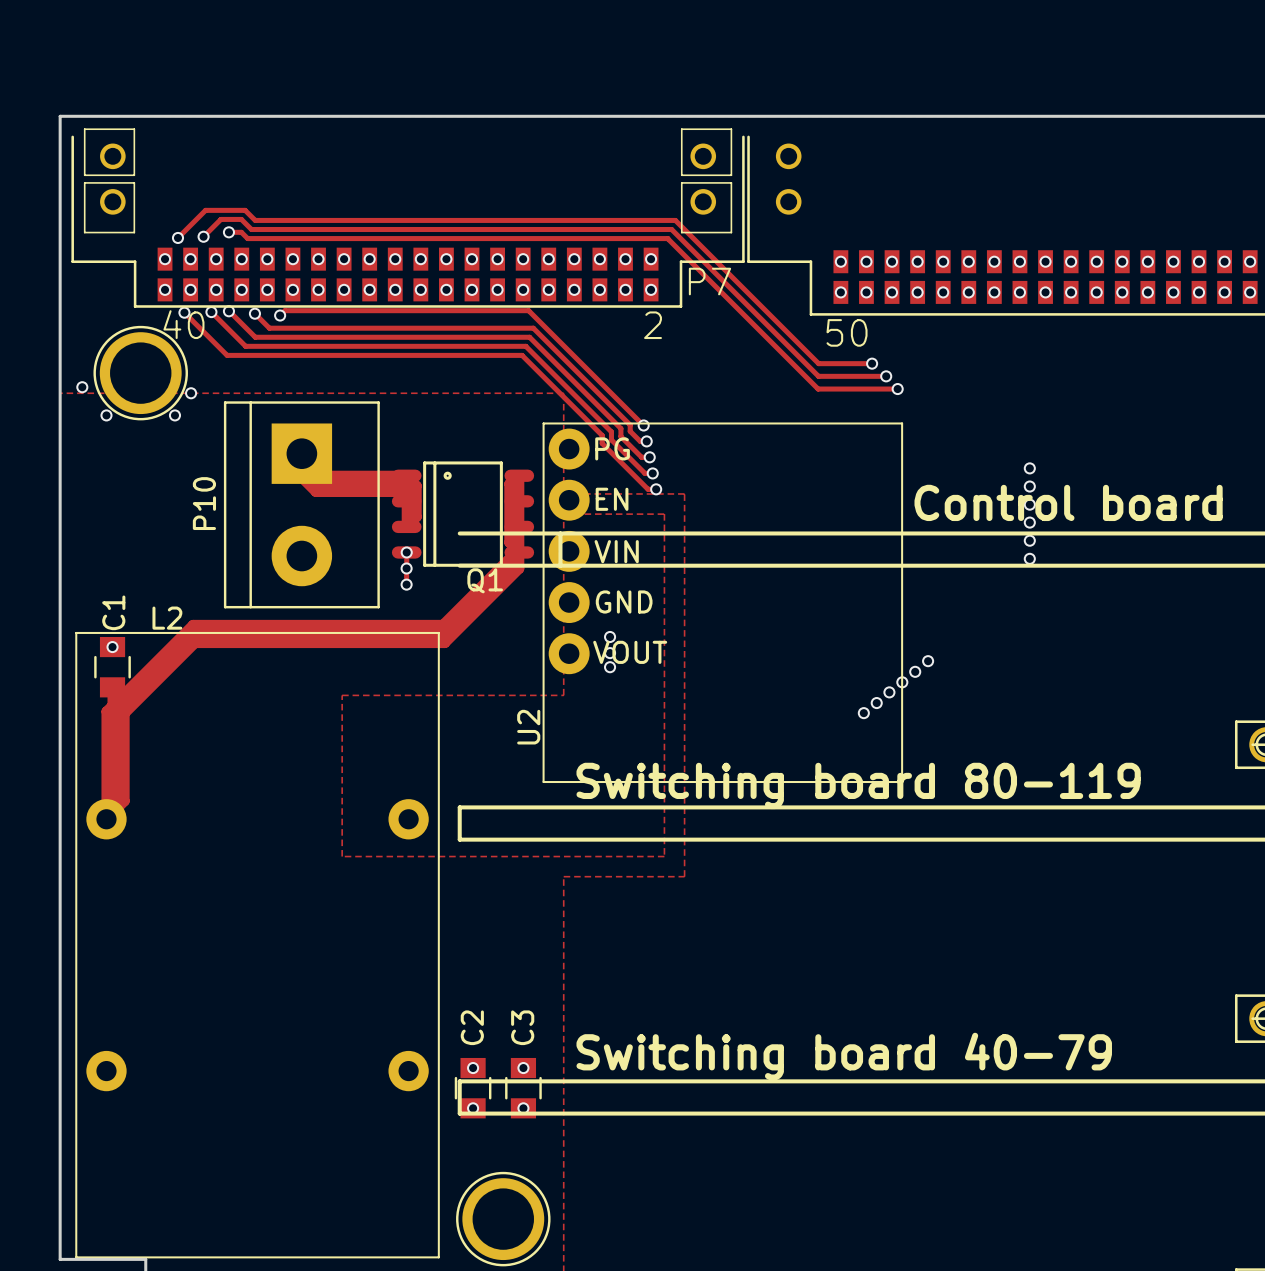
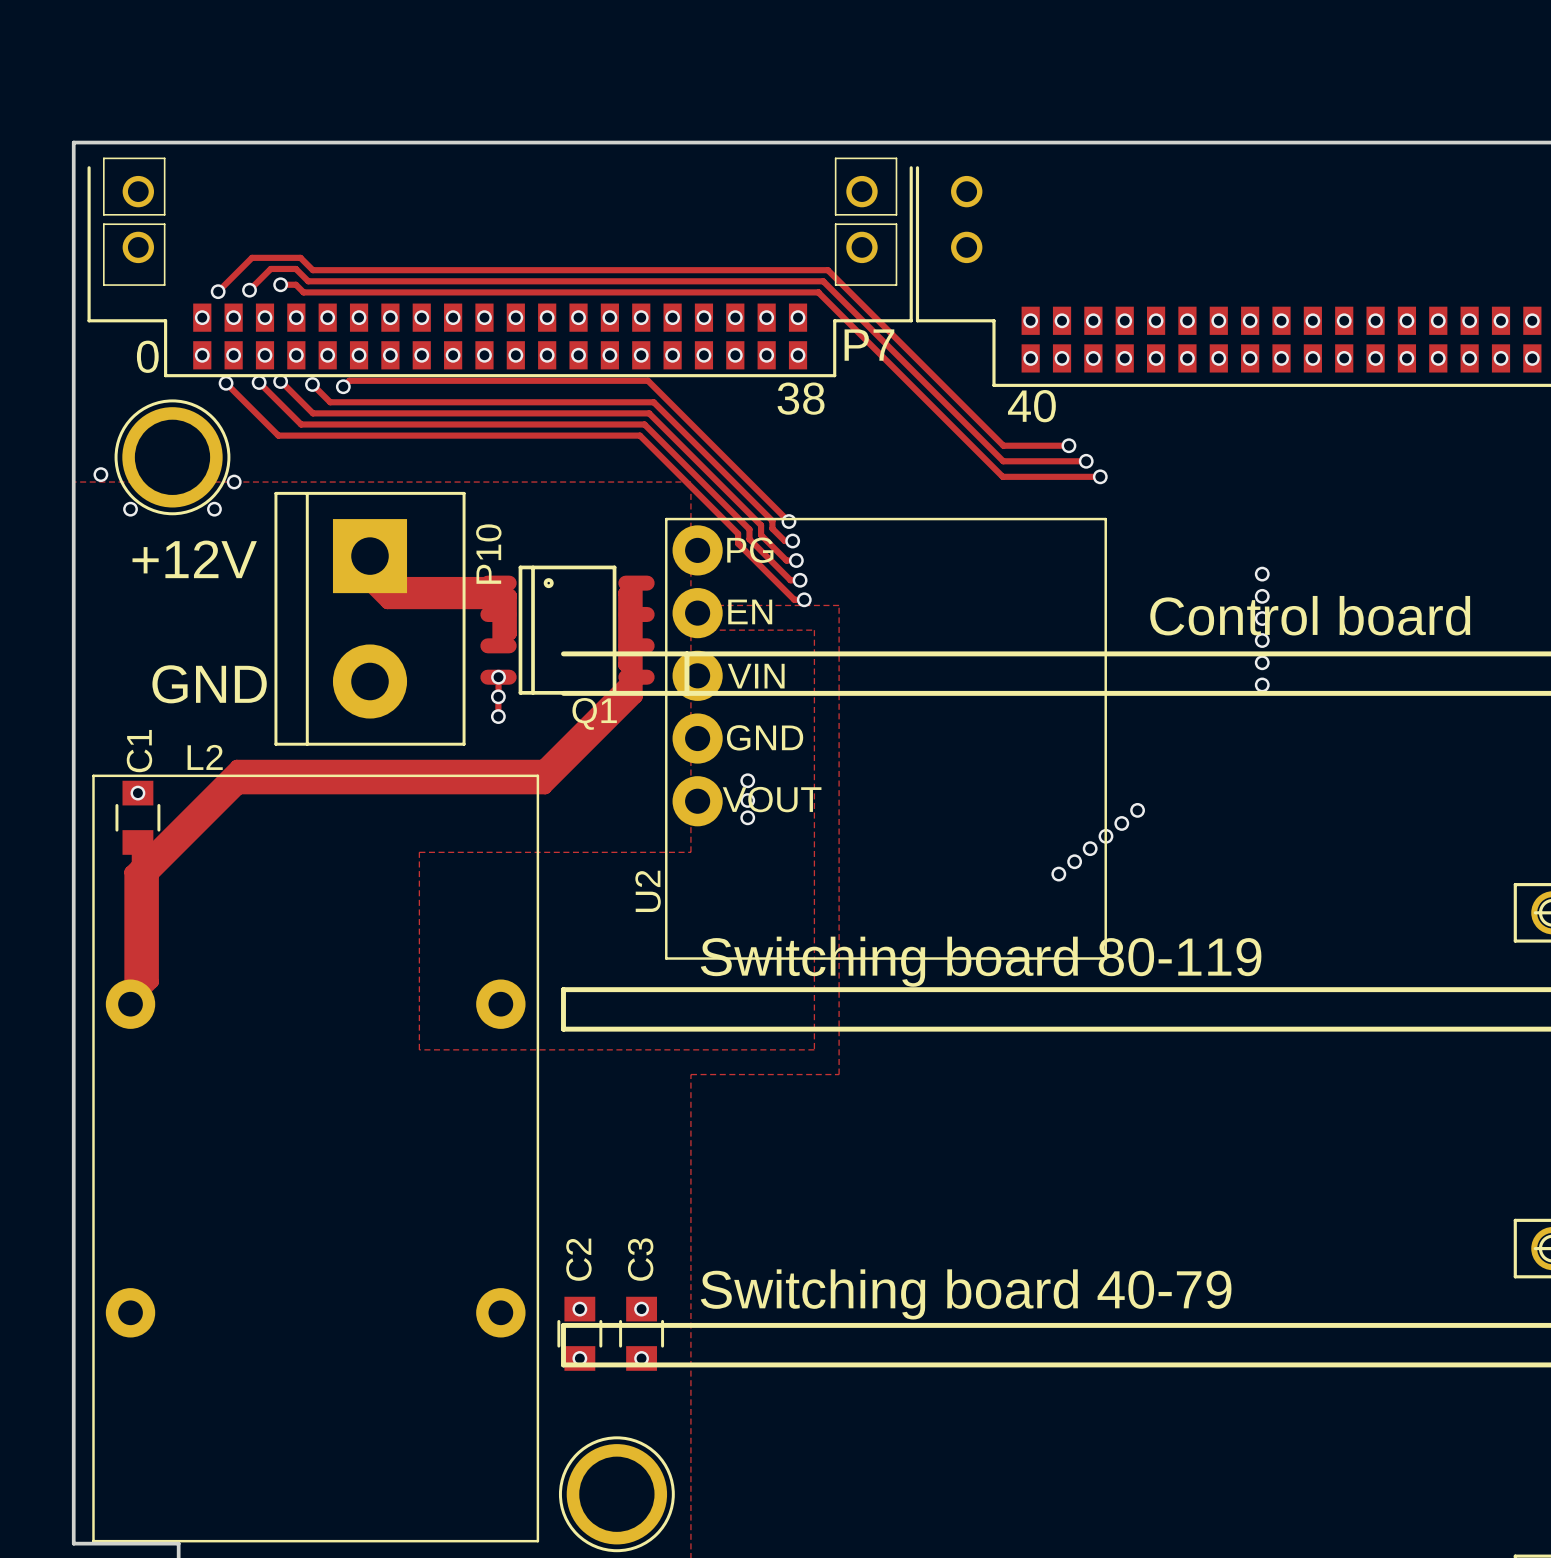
P7 text: none -> 0 (147, 356)
P7 text: 40 (183, 324) -> none
P7 text: 2 (653, 325) -> 38 (801, 398)
part text: none -> 40 (1031, 406)
part text: 50 (847, 332) -> none
text: none -> +12V (194, 559)
P10 name position: P10 (204, 503) -> P10 (488, 554)
text: none -> GND (209, 684)

